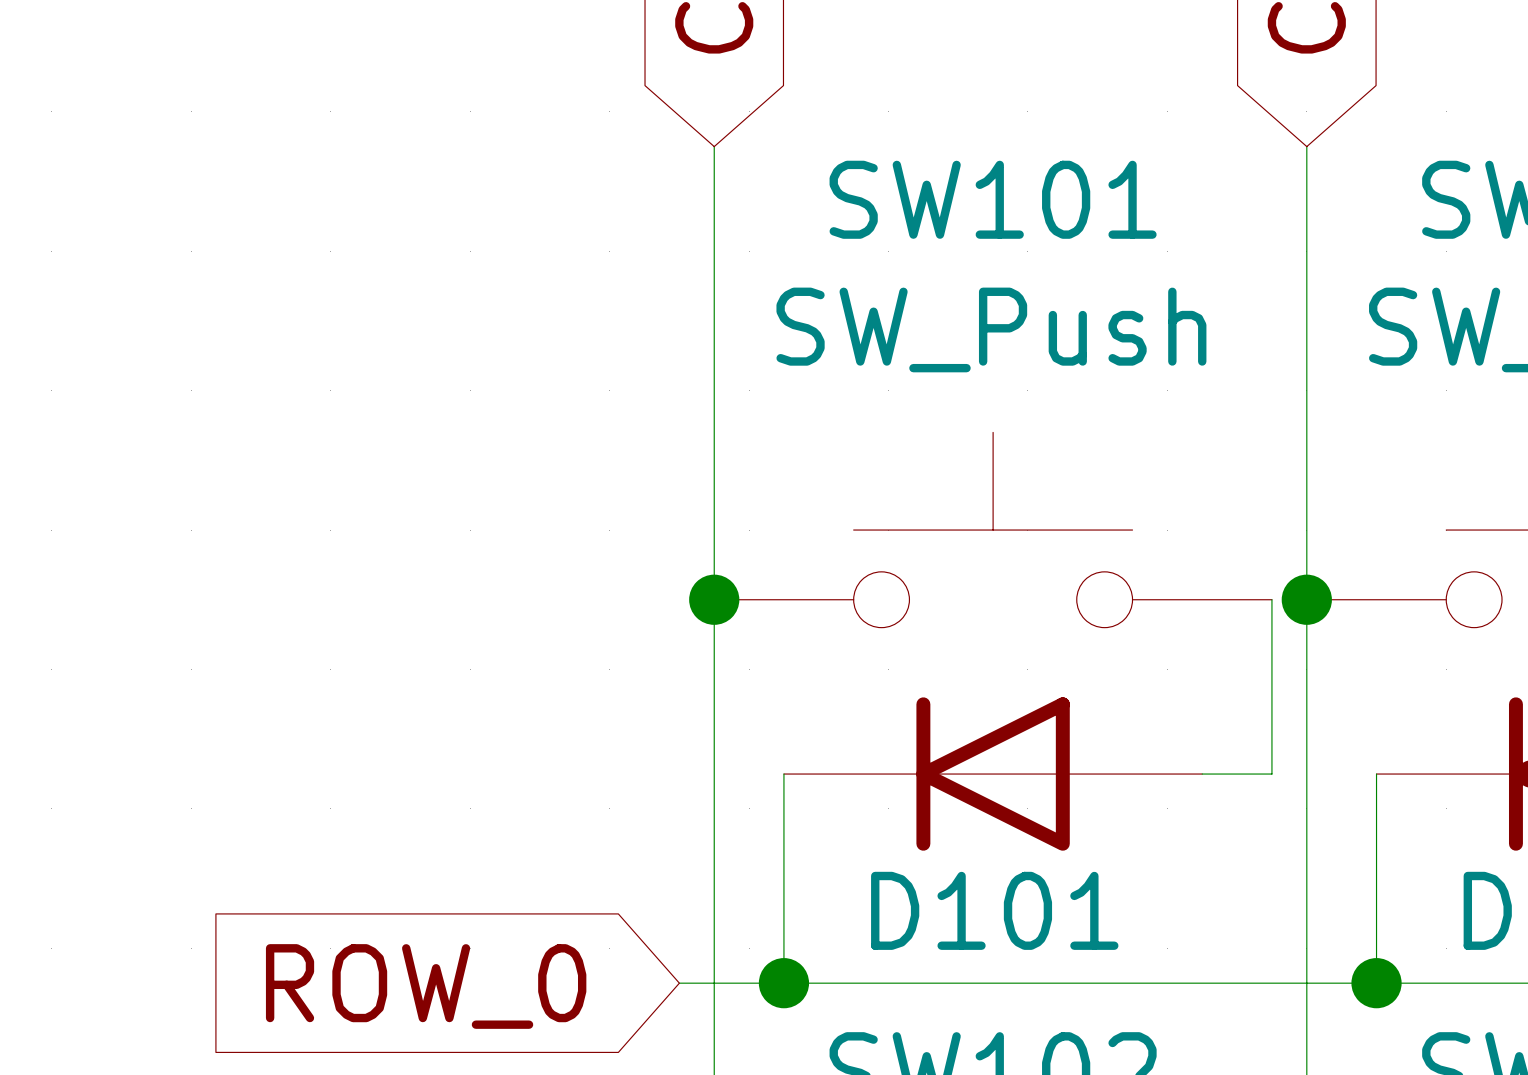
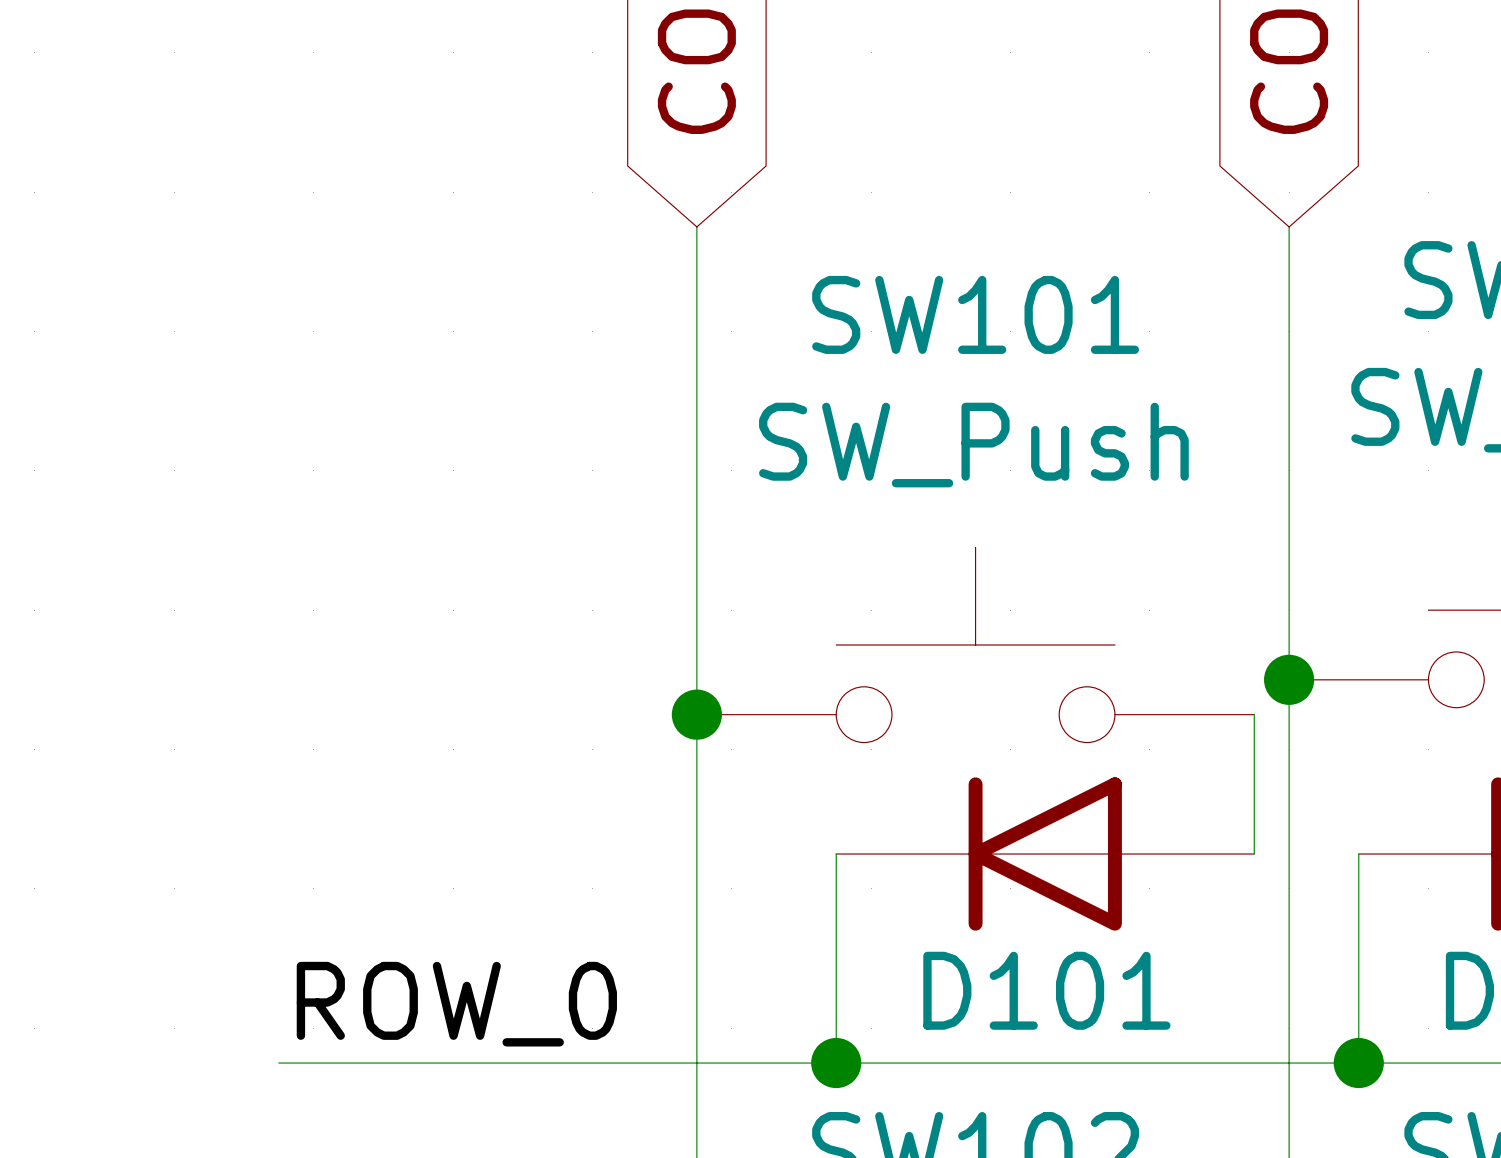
SW101 position: (993, 530) -> (975, 644)
junction position: (714, 599) -> (696, 714)
wire: (1271, 599) (1271, 634) -> none
wire: (783, 774) (783, 983) -> (836, 854) (836, 1063)
D101 position: (993, 774) -> (1045, 854)
label: none -> ROW_0 (456, 1004)
wire: none -> (278, 1063) (662, 1063)
junction position: (783, 983) -> (836, 1063)
global label: ROW_0 (426, 986) -> none

